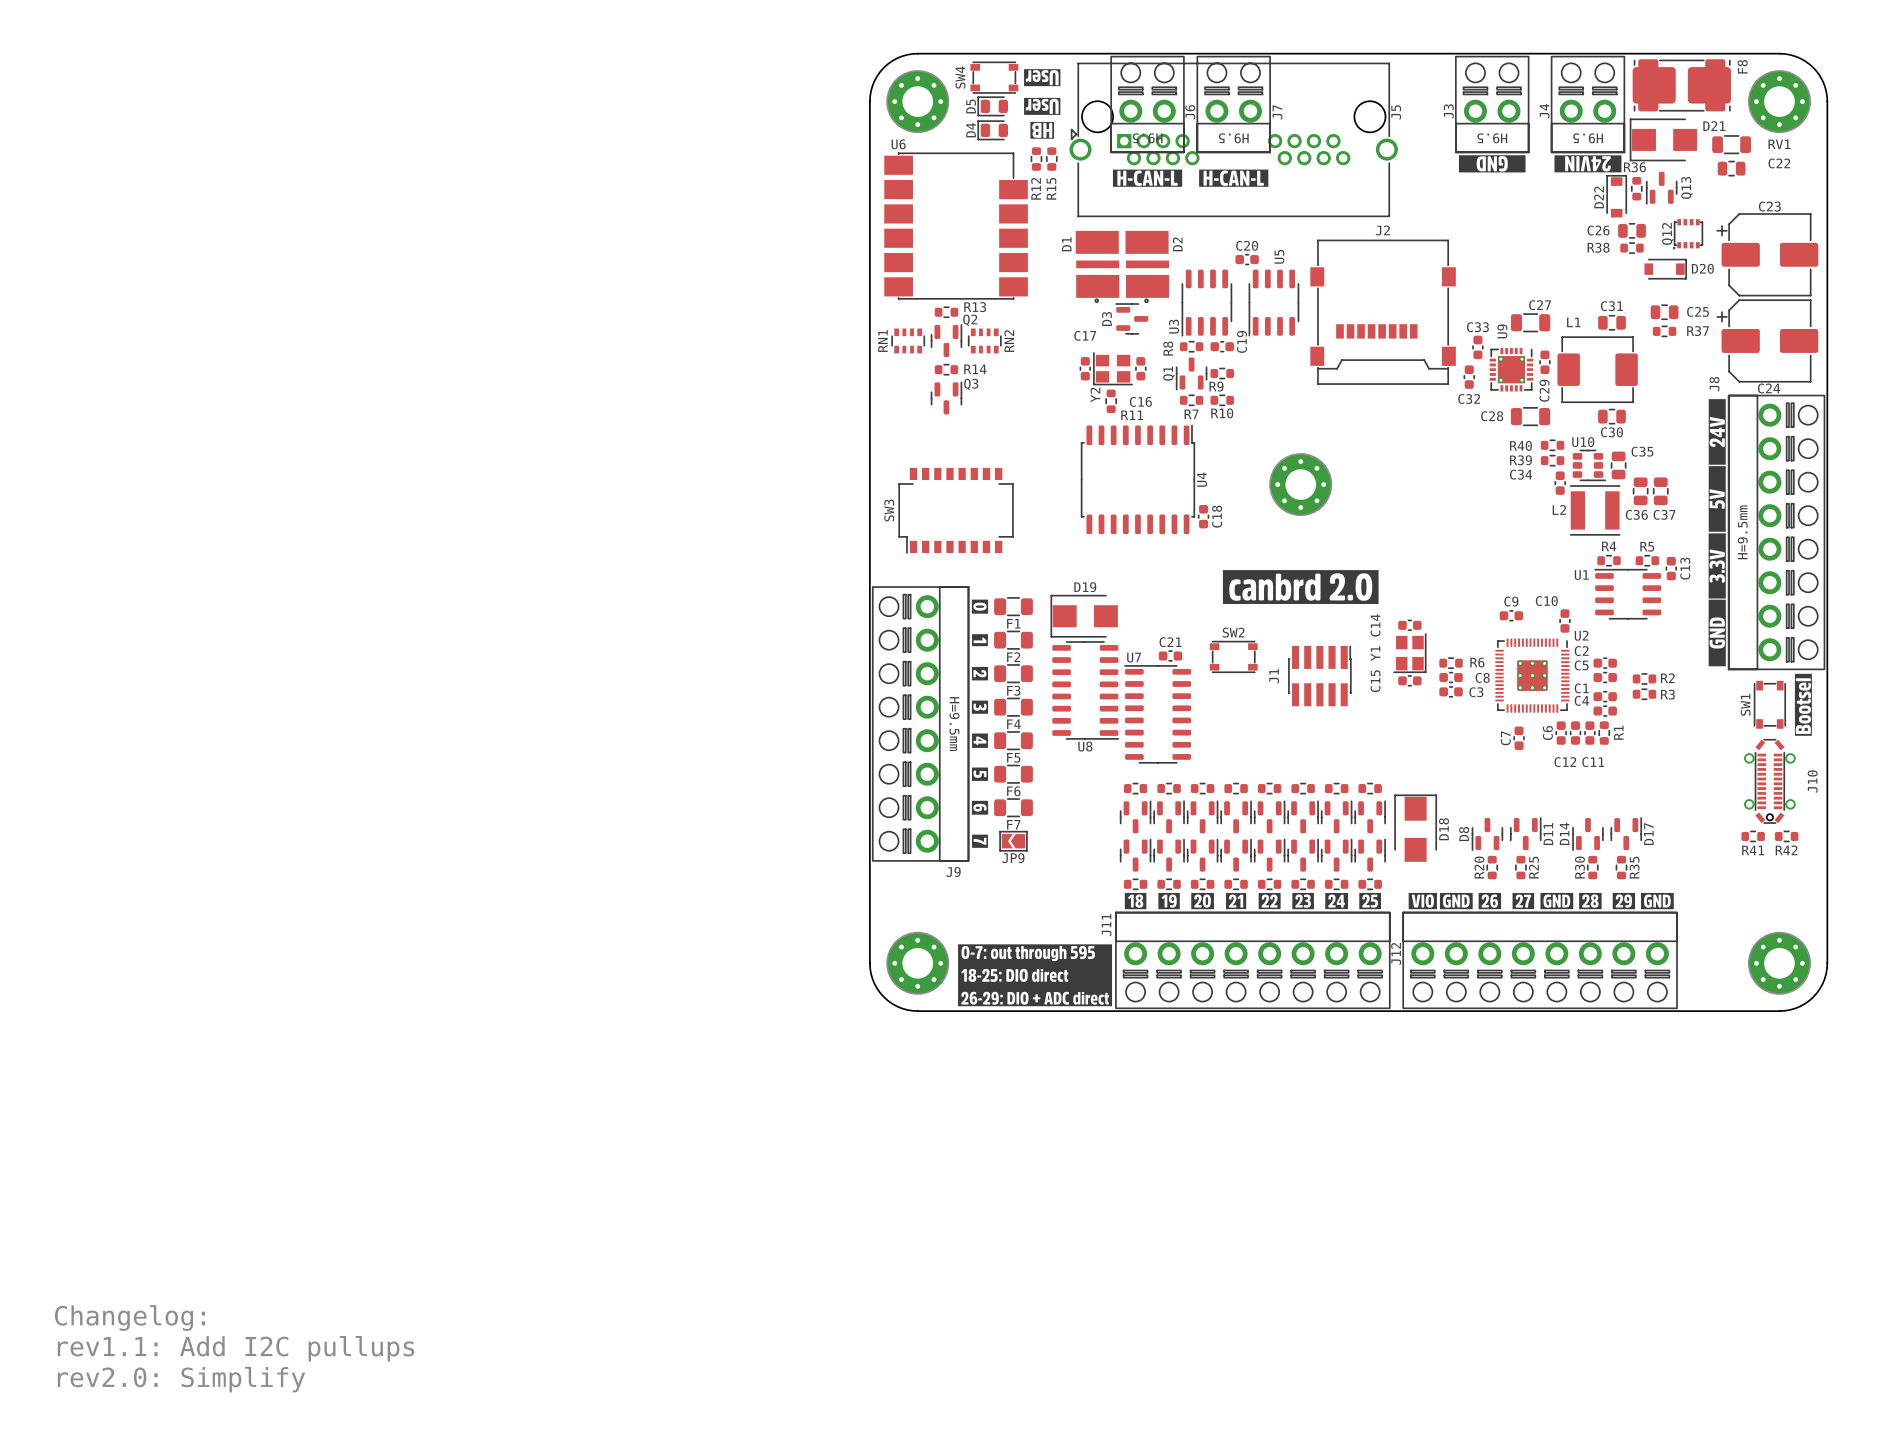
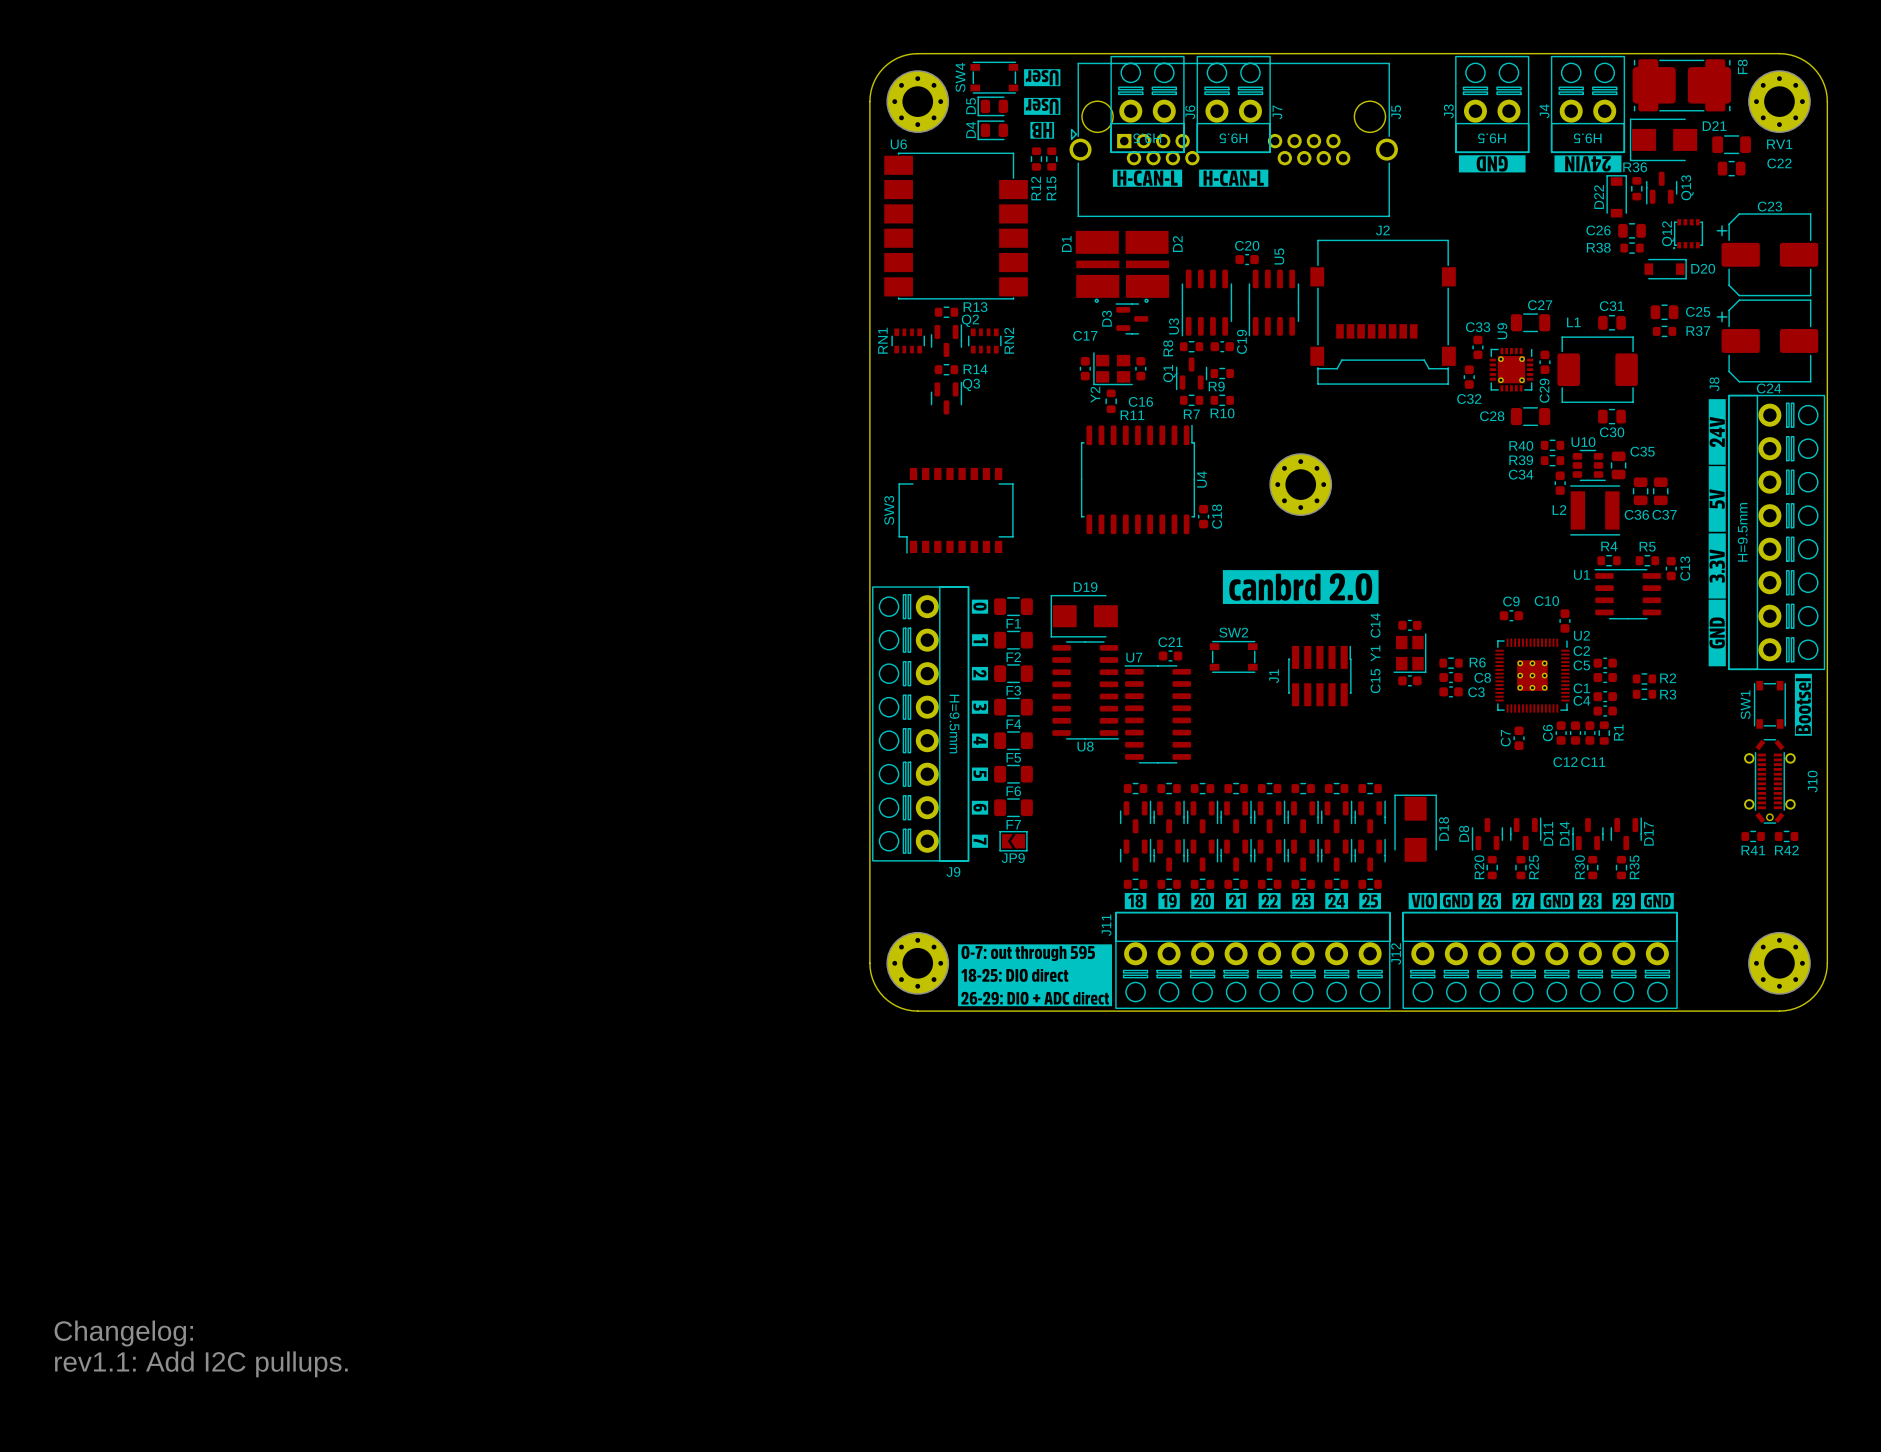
text position: Changelog: (129, 1318) -> Changelog: (123, 1333)
text: rev1.1: Add I2C pullups (236, 1348) -> rev1.1: Add I2C pullups. (201, 1364)
text: rev2.0: Simplify (181, 1379) -> none

